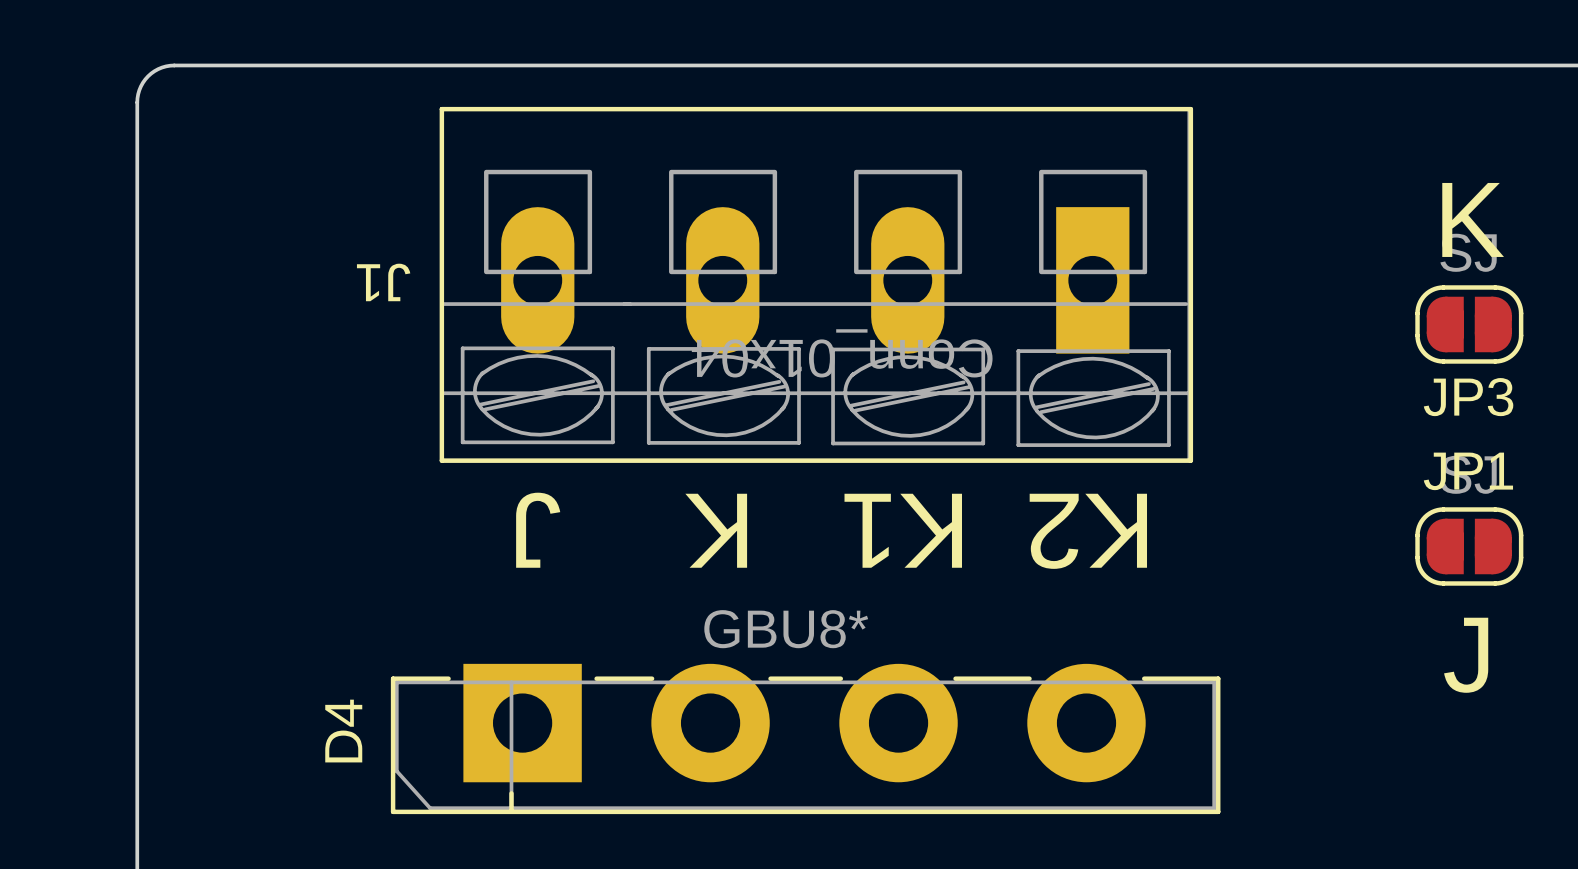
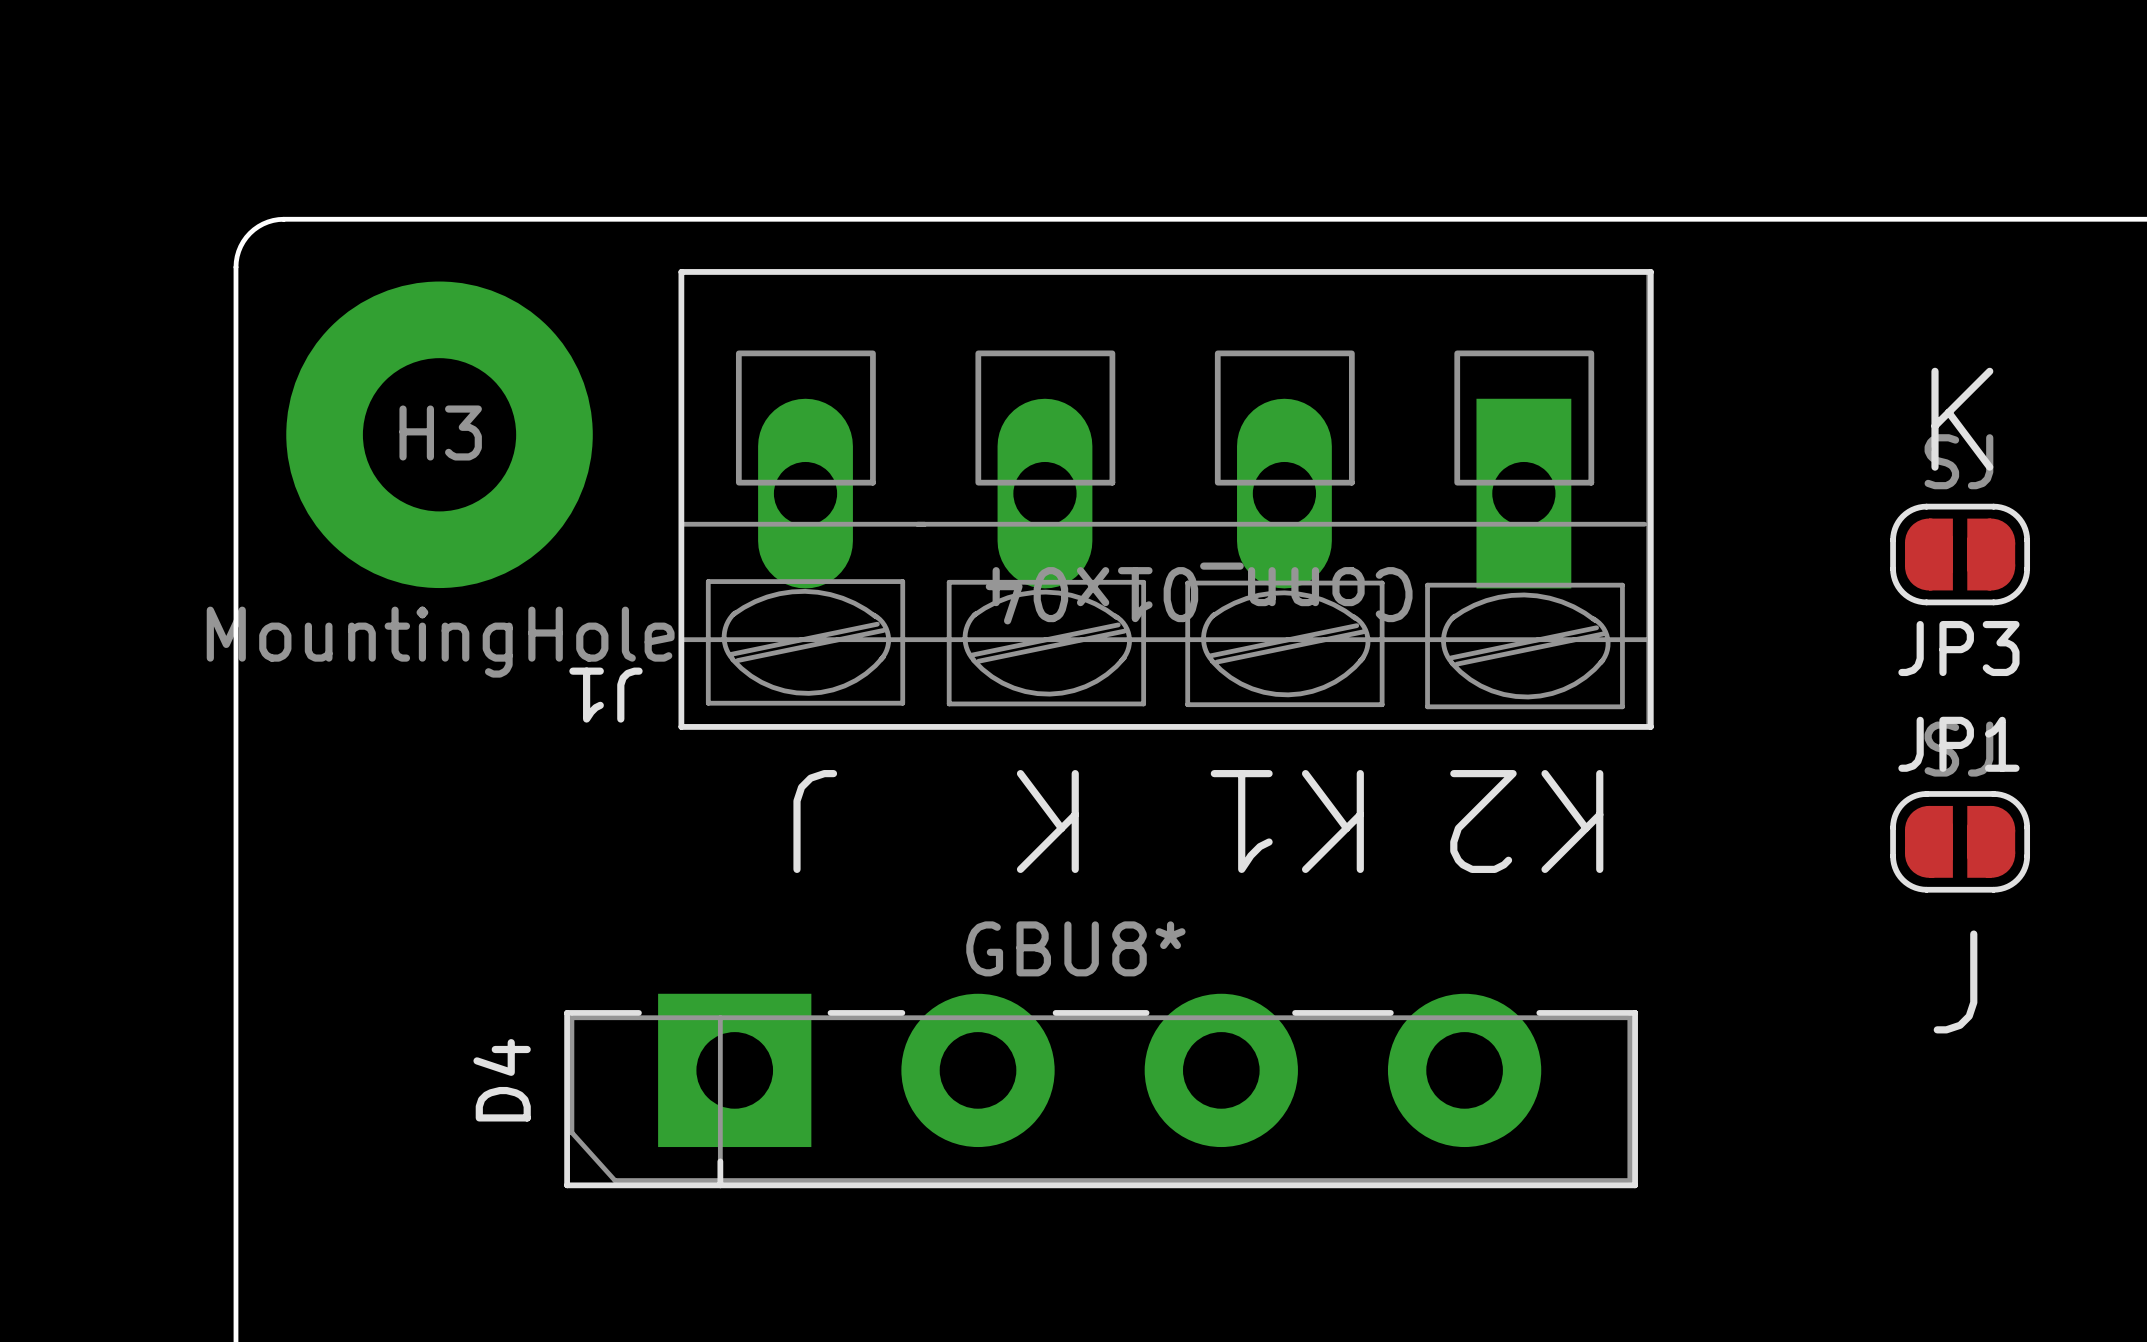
H3: none -> MountingHole (439, 434)
J1 name position: J1 (383, 282) -> J1 (605, 695)
J1 position: (816, 284) -> (1166, 499)
text position: J (538, 530) -> J (815, 821)
text position: K (716, 530) -> K (1047, 821)
text position: K1 (903, 530) -> K1 (1287, 821)
text position: K2 (1088, 531) -> K2 (1526, 821)

